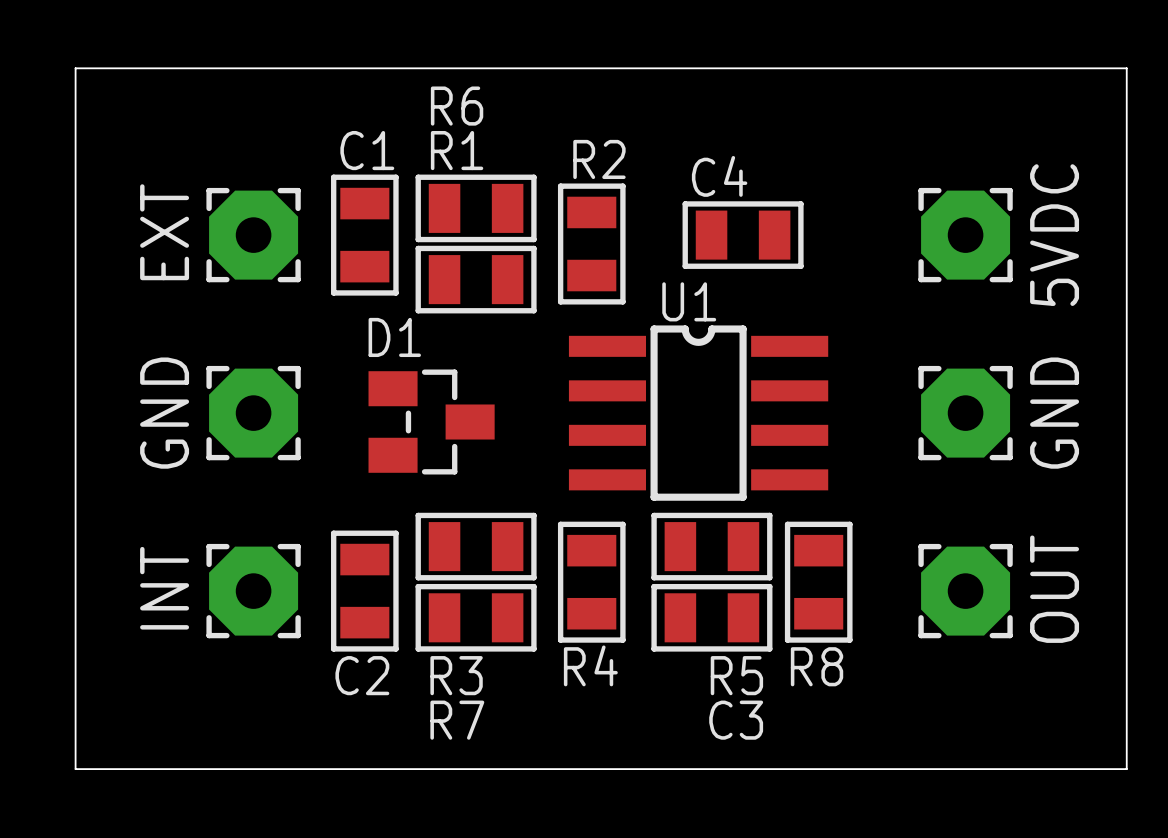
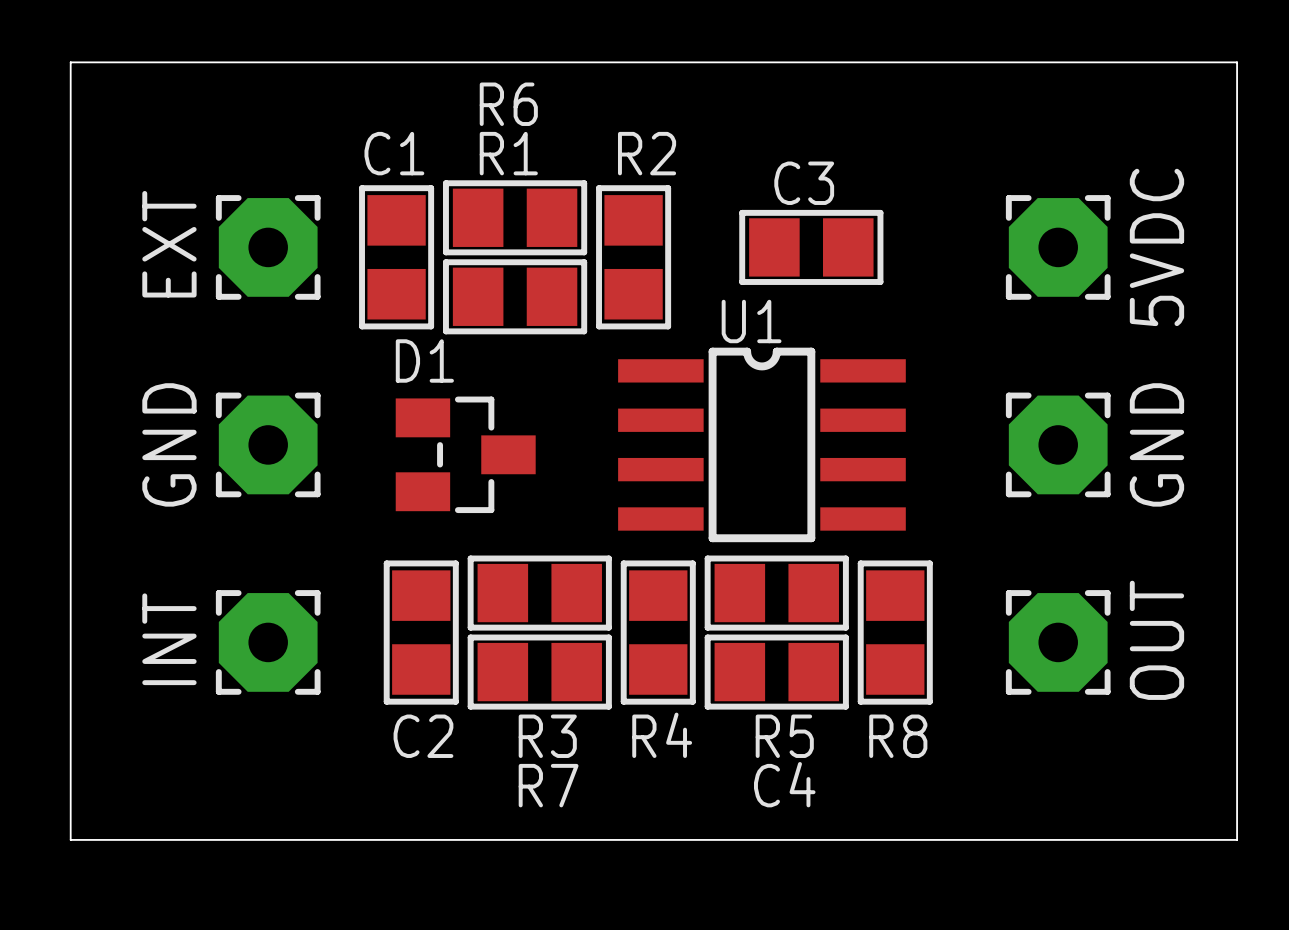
C1 footprint: [331, 174, 399, 296] -> [367, 195, 426, 320]
R6 footprint: [415, 174, 537, 243] -> [452, 188, 578, 247]
C4 name position: C4 (719, 176) -> C4 (784, 784)
line: none -> (445, 183) (445, 252) (584, 252) (584, 183) (445, 183)
line: none -> (362, 188) (431, 188) (431, 326) (362, 326) (362, 188)
line: none -> (599, 188) (668, 188) (668, 326) (599, 326) (599, 188)
R2 footprint: [557, 183, 626, 305] -> [604, 195, 663, 320]
C4 footprint: [682, 201, 804, 269] -> [714, 642, 839, 702]
line: none -> (742, 212) (880, 212) (880, 281) (742, 281) (742, 212)
R1 footprint: [415, 245, 537, 314] -> [452, 267, 578, 326]
line: none -> (445, 262) (445, 331) (584, 331) (584, 262) (445, 262)
R3 footprint: [415, 512, 537, 581] -> [477, 563, 602, 623]
R5 footprint: [651, 512, 773, 581] -> [714, 563, 839, 623]
line: none -> (470, 558) (470, 627) (608, 627) (608, 558) (470, 558)
line: none -> (707, 558) (845, 558) (845, 627) (707, 627) (707, 558)
line: none -> (386, 563) (386, 701) (455, 701) (455, 563) (386, 563)
line: none -> (623, 563) (692, 563) (692, 701) (623, 701) (623, 563)
line: none -> (860, 563) (929, 563) (929, 701) (860, 701) (860, 563)
R4 footprint: [557, 521, 626, 643] -> [629, 570, 688, 695]
R8 footprint: [784, 521, 853, 643] -> [866, 570, 925, 695]
C2 footprint: [331, 530, 399, 652] -> [392, 570, 451, 695]
R7 footprint: [415, 583, 537, 652] -> [477, 642, 602, 702]
C3 footprint: [651, 583, 773, 652] -> [749, 218, 874, 277]
line: none -> (470, 637) (470, 706) (608, 706) (608, 637) (470, 637)
line: none -> (707, 637) (845, 637) (845, 706) (707, 706) (707, 637)
C3 name position: C3 (736, 720) -> C3 (804, 183)

